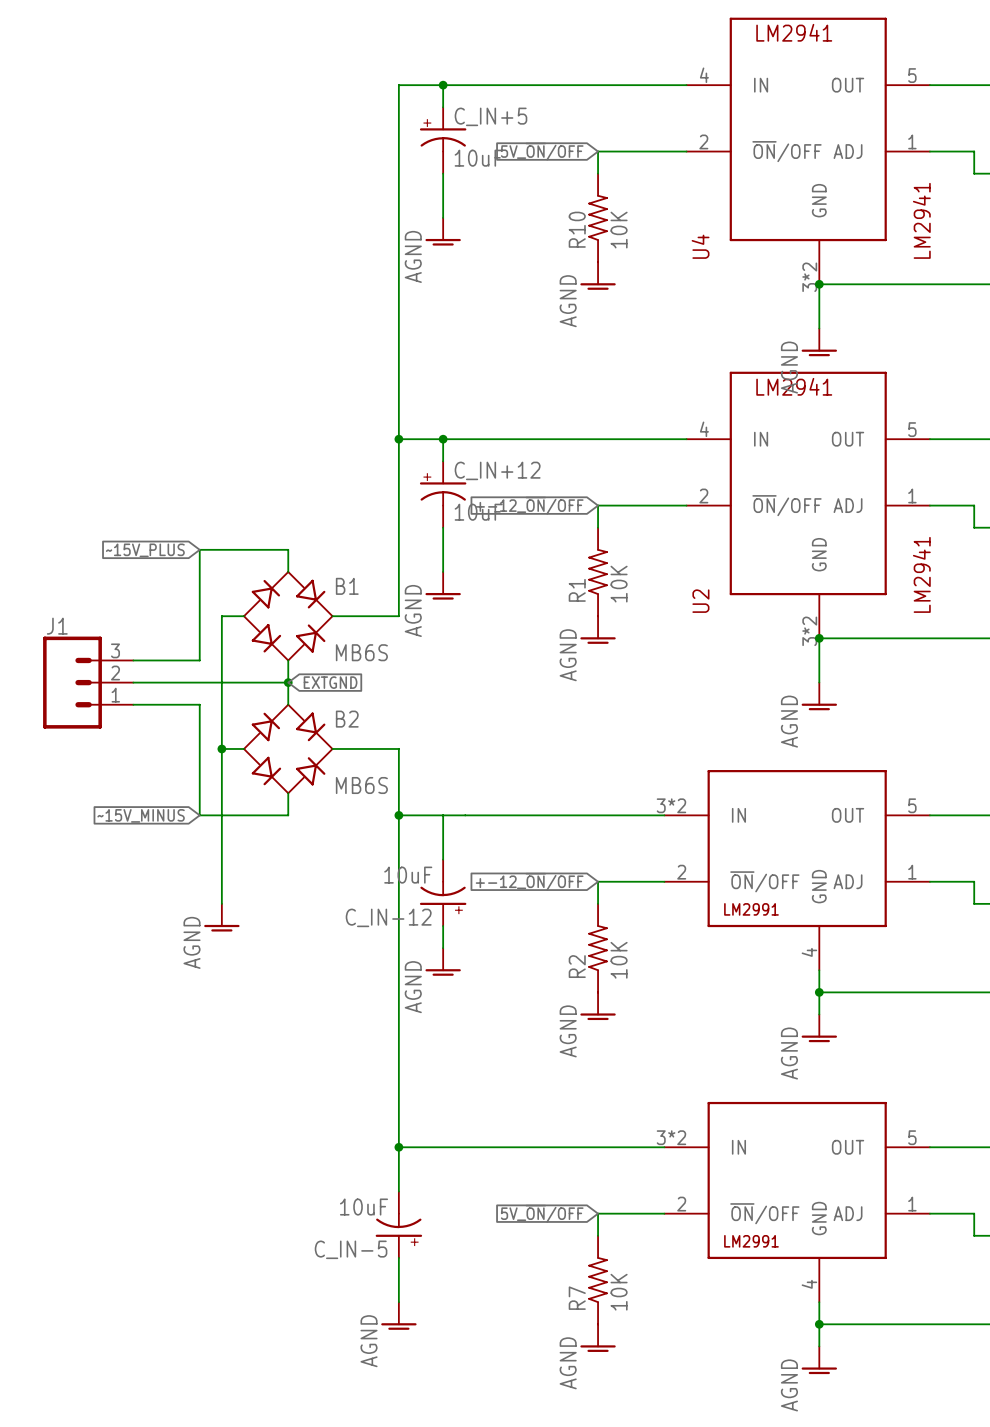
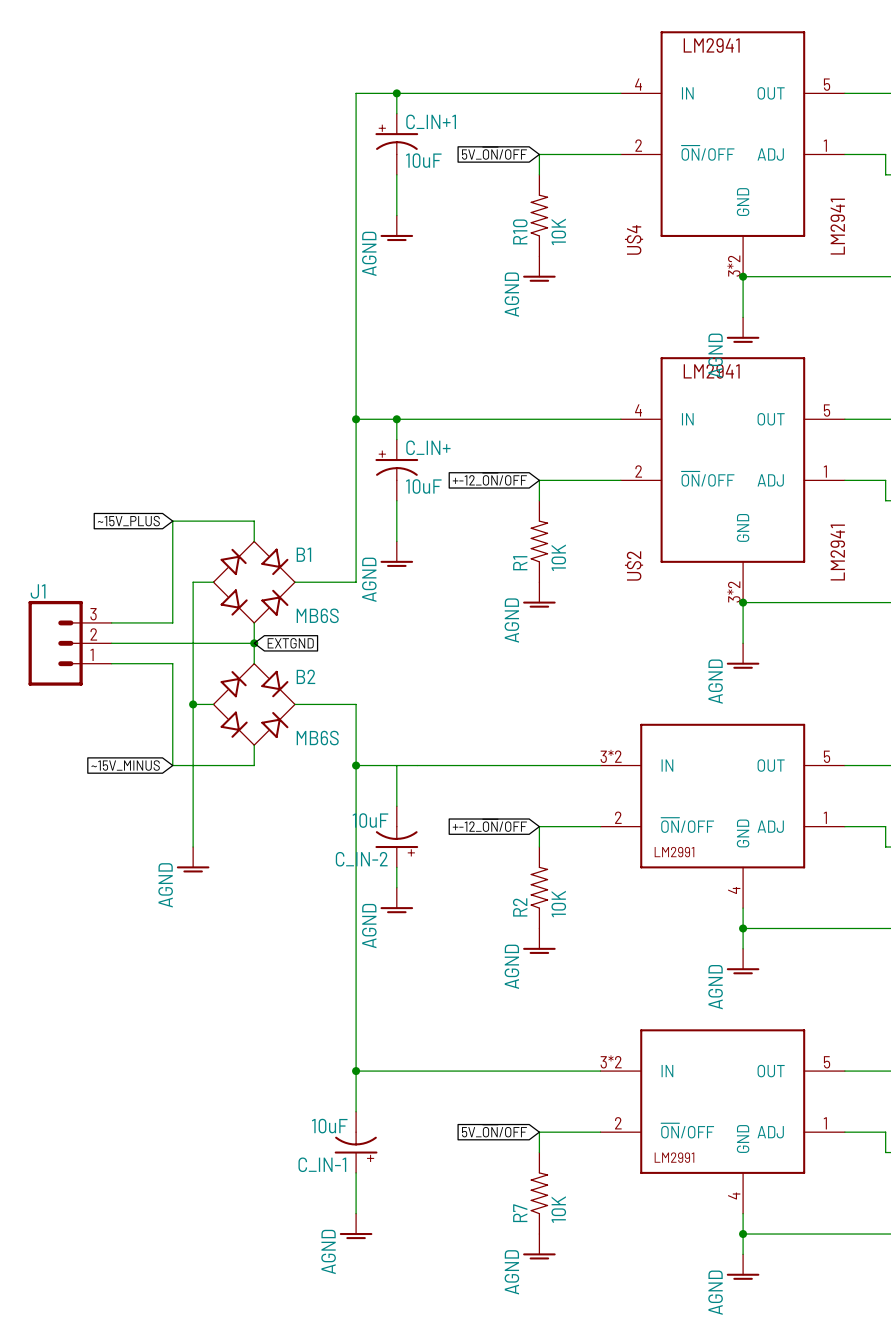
C_IN+5 name: C_IN+5 (490, 116) -> C_IN+1 (431, 121)
U4 name: U4 (700, 246) -> U$4 (634, 239)
C_IN+12 name: C_IN+12 (497, 470) -> C_IN+ (428, 447)
U2 name: U2 (700, 601) -> U$2 (634, 565)
C_IN-12 name: C_IN-12 (388, 917) -> C_IN-2 (361, 859)
C_IN-5 name: C_IN-5 (351, 1249) -> C_IN-1 (322, 1164)

